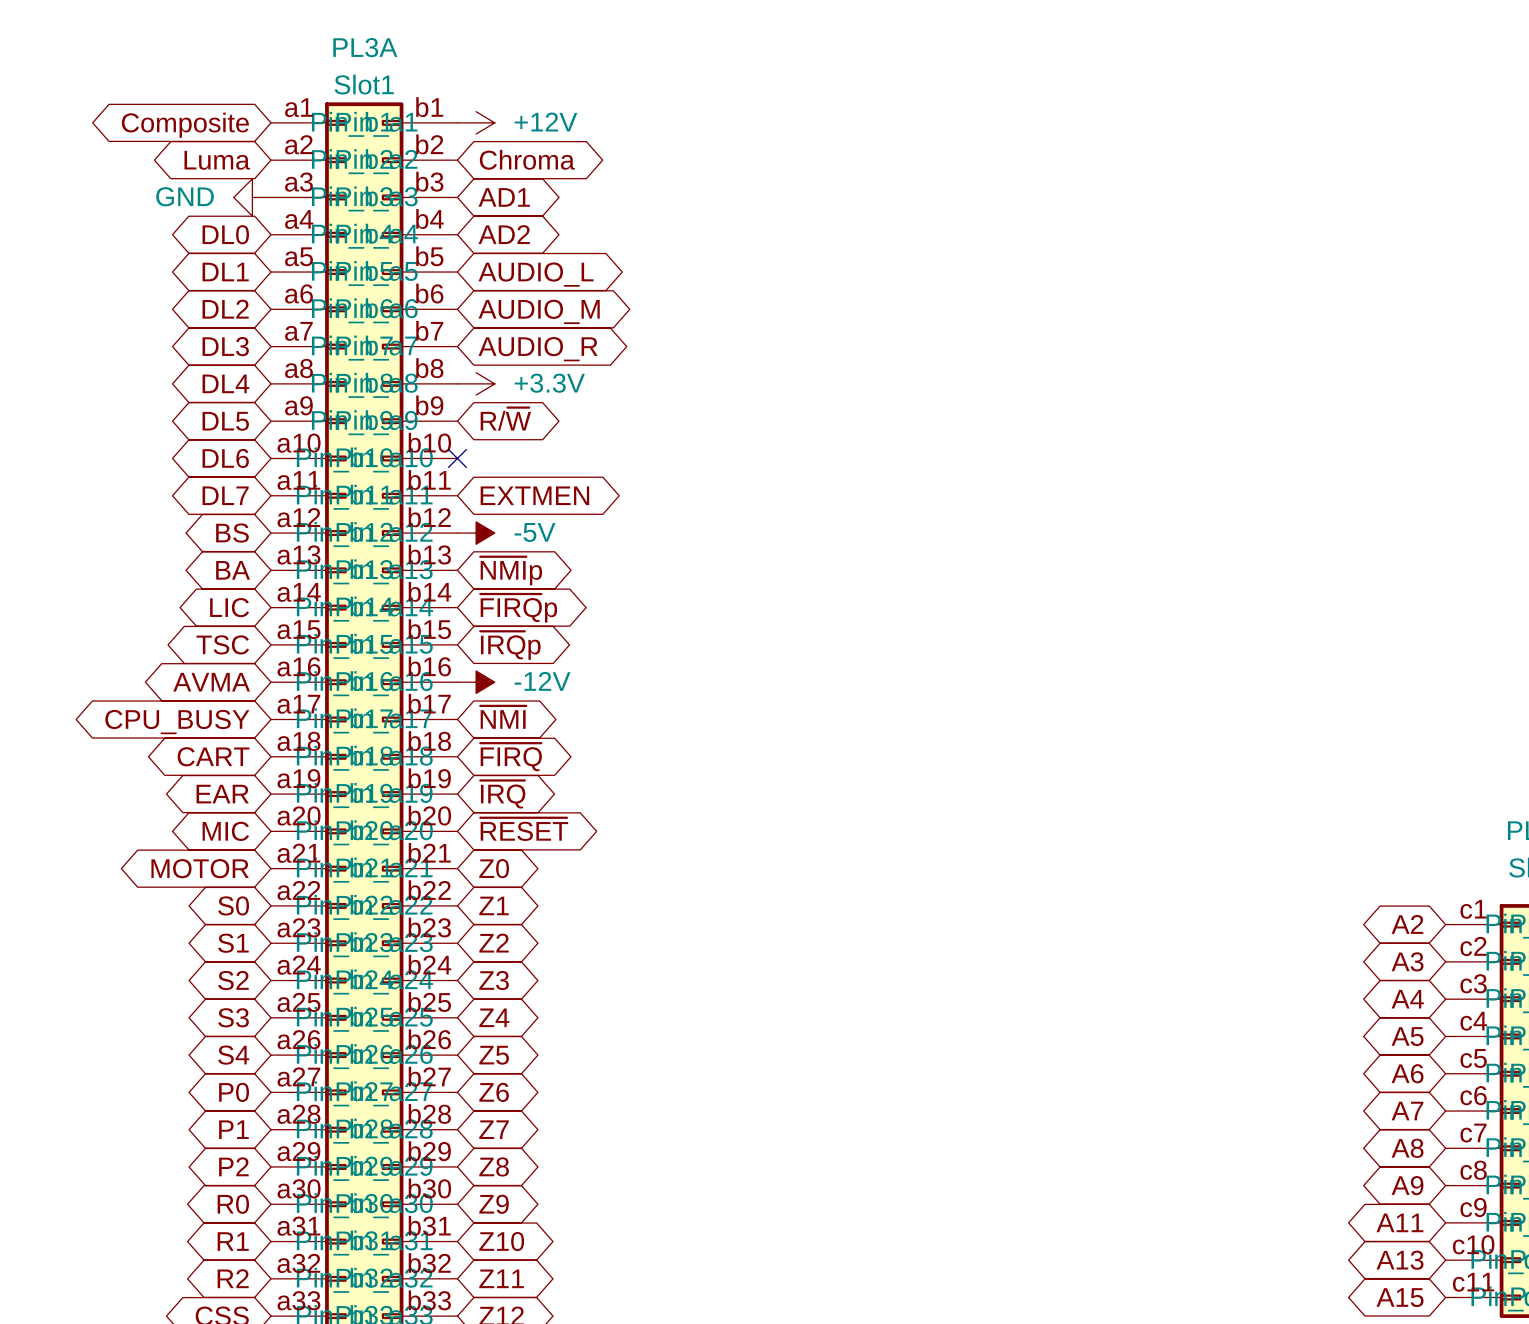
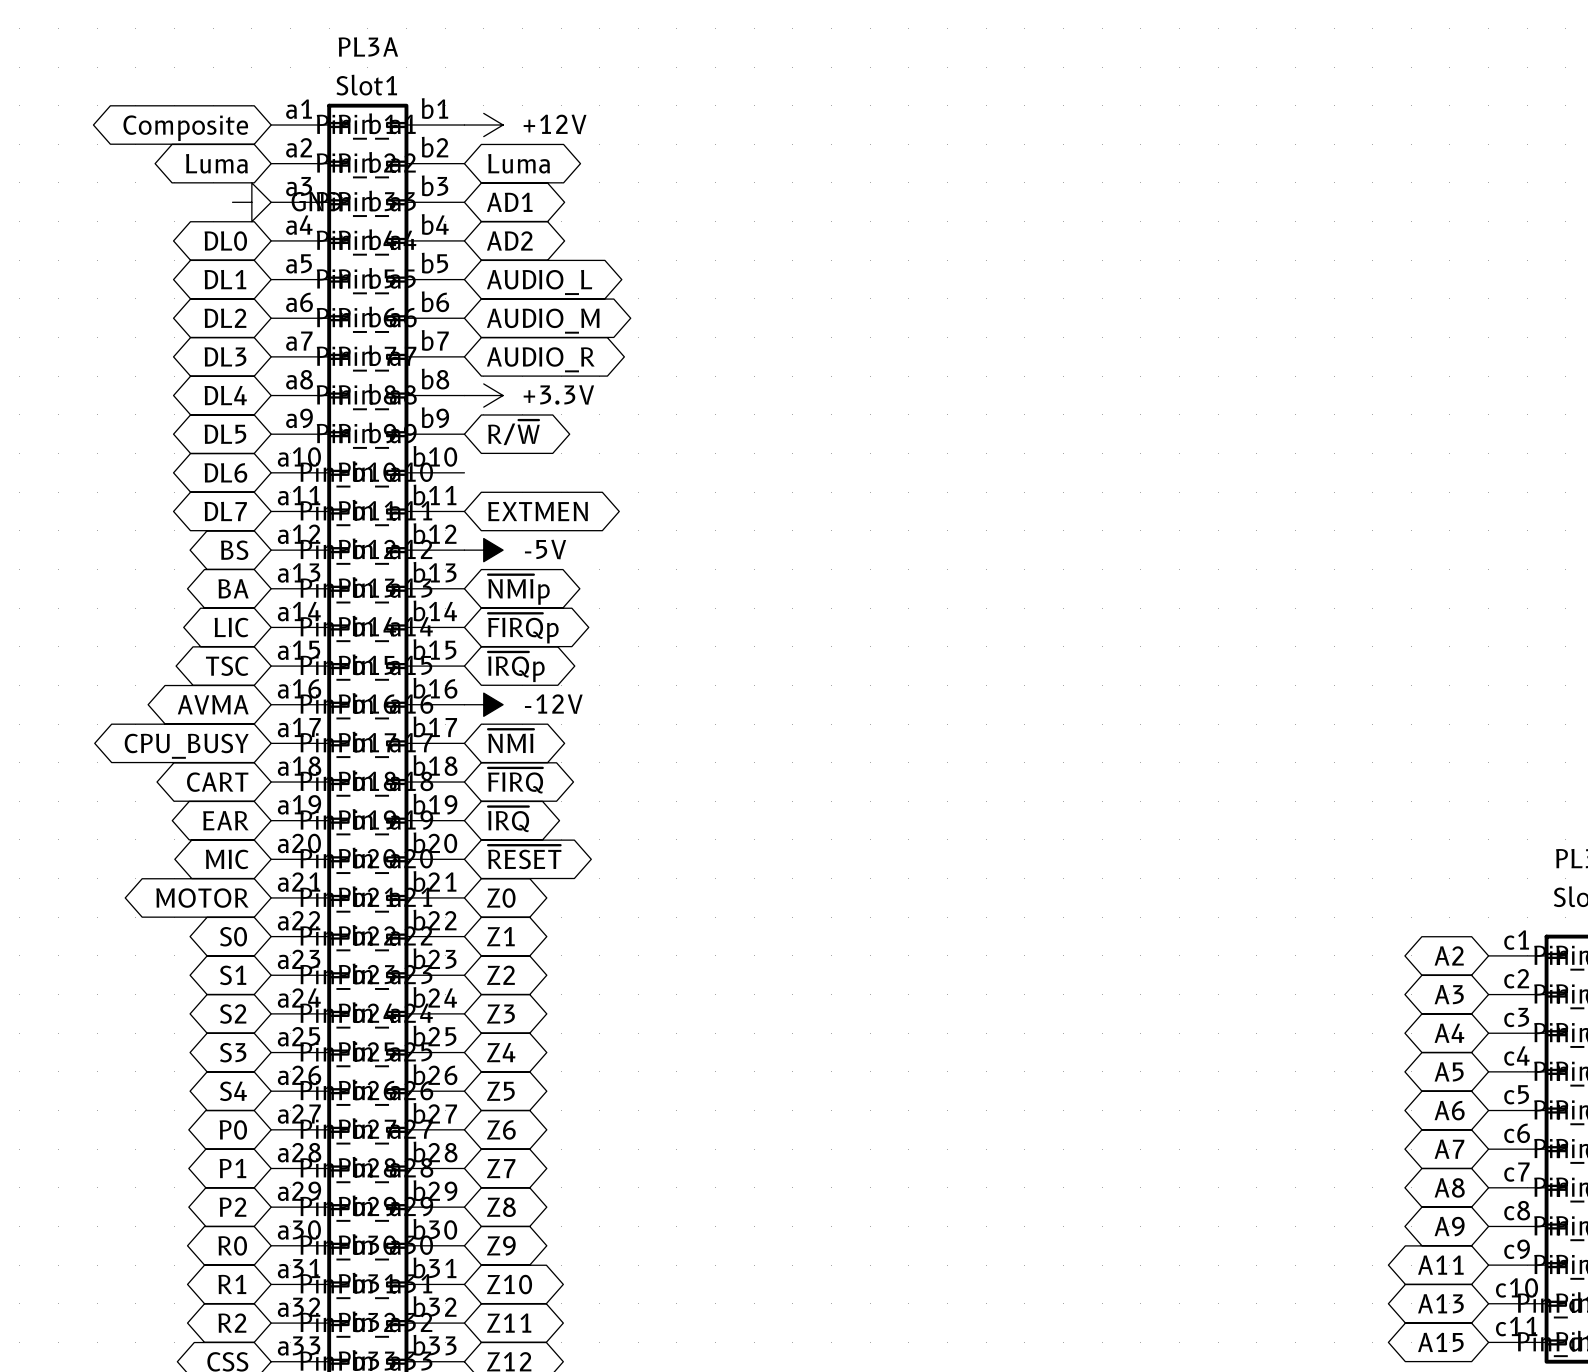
global label: Chroma (527, 159) -> Luma (519, 163)
power symbol rotation: 0° (252, 197) -> 180° (251, 202)
no-connect mark: (457, 458) -> none

